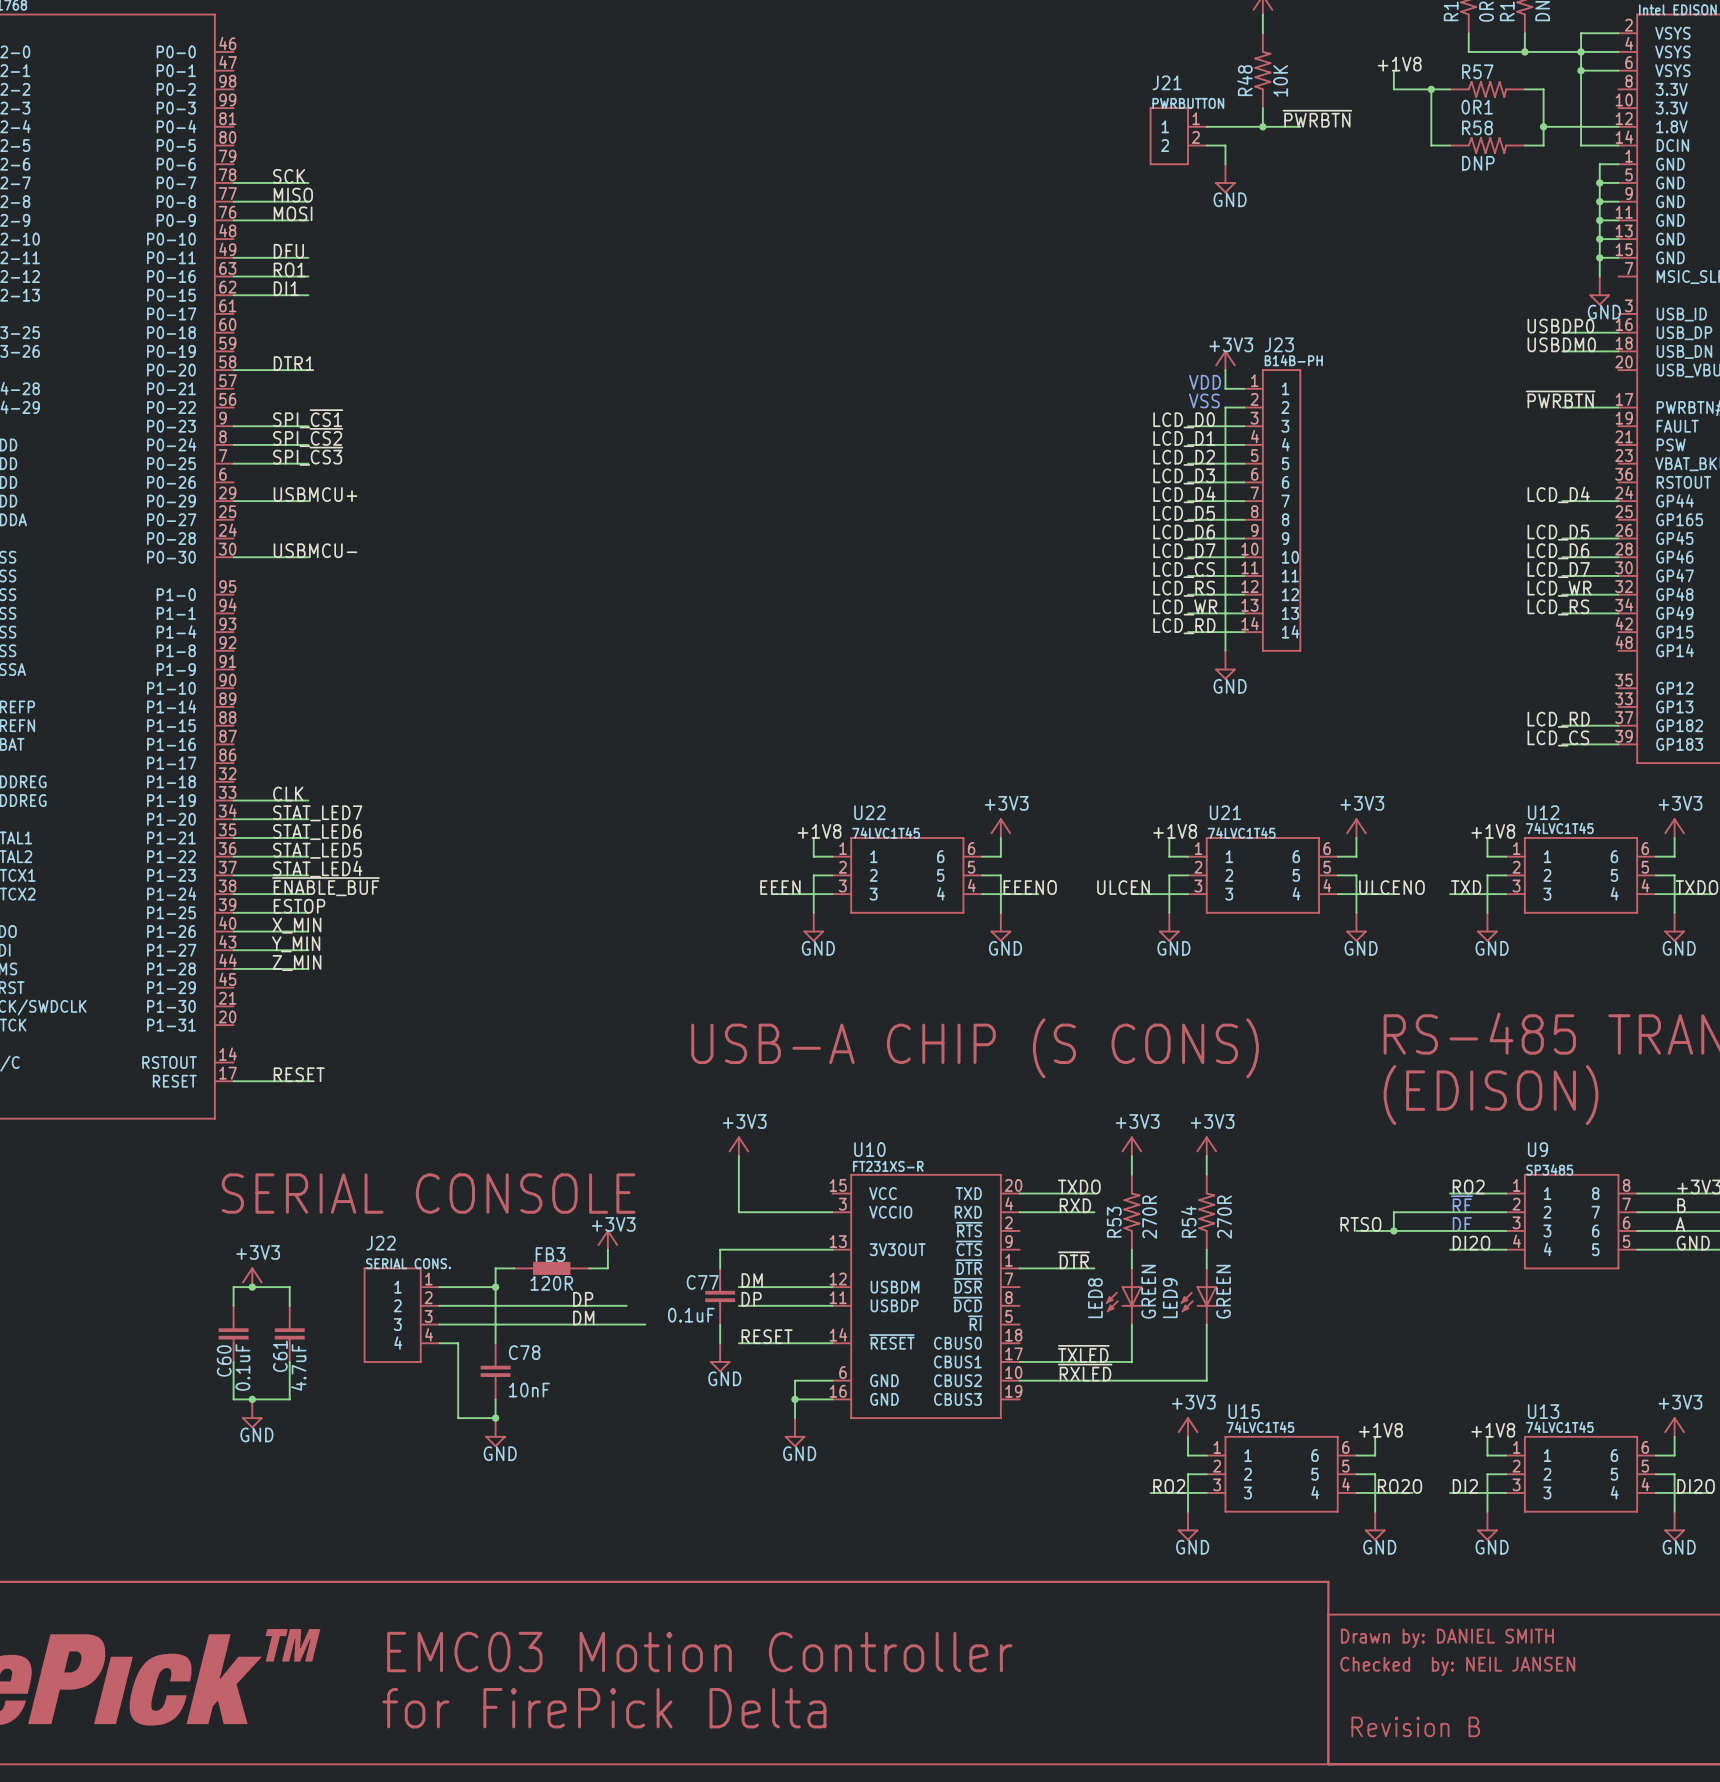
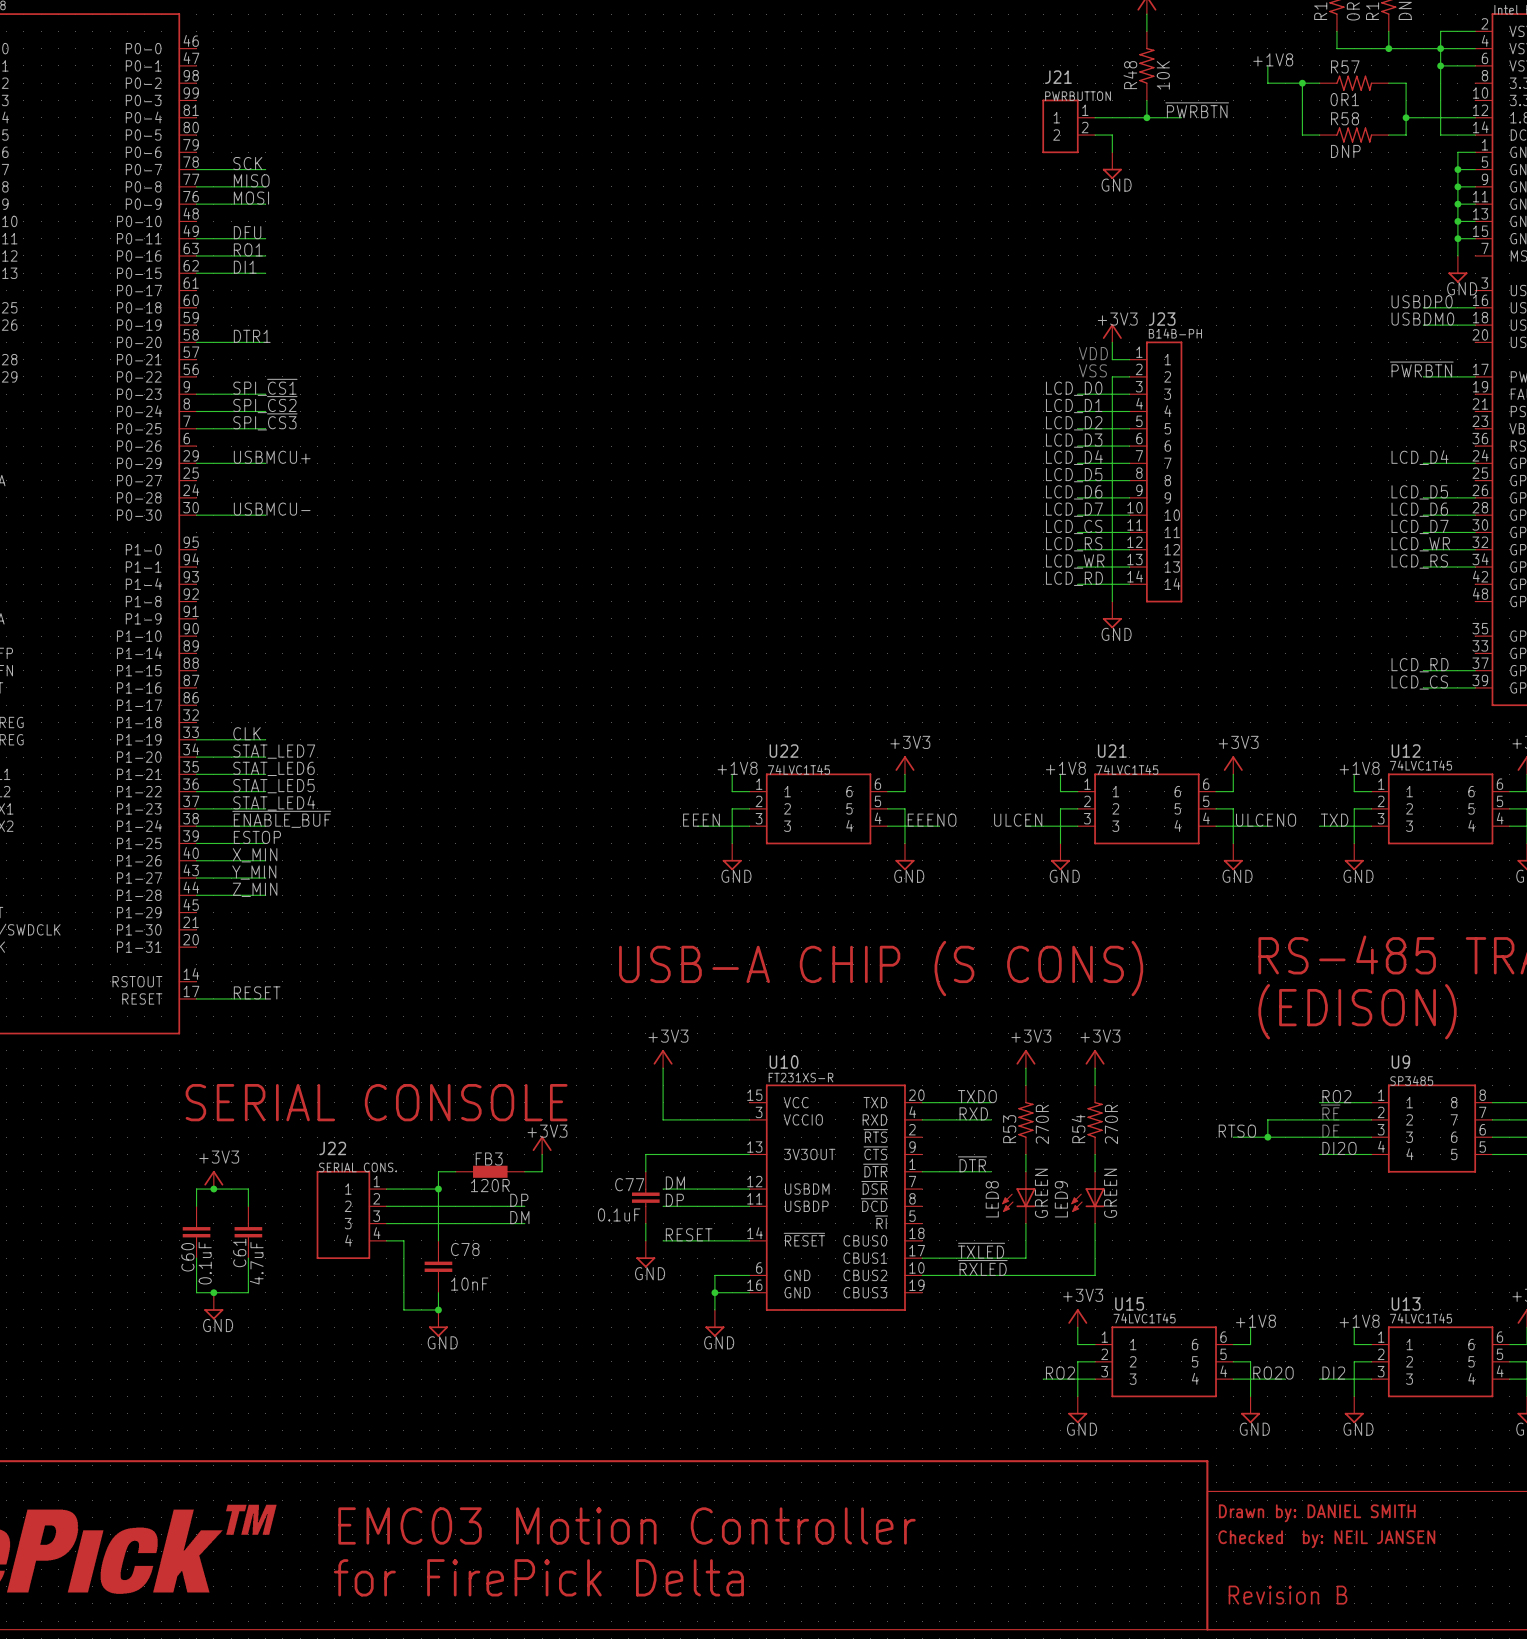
wire: (589, 1305) (626, 1305) -> none
wire: (589, 1324) (645, 1324) -> none

